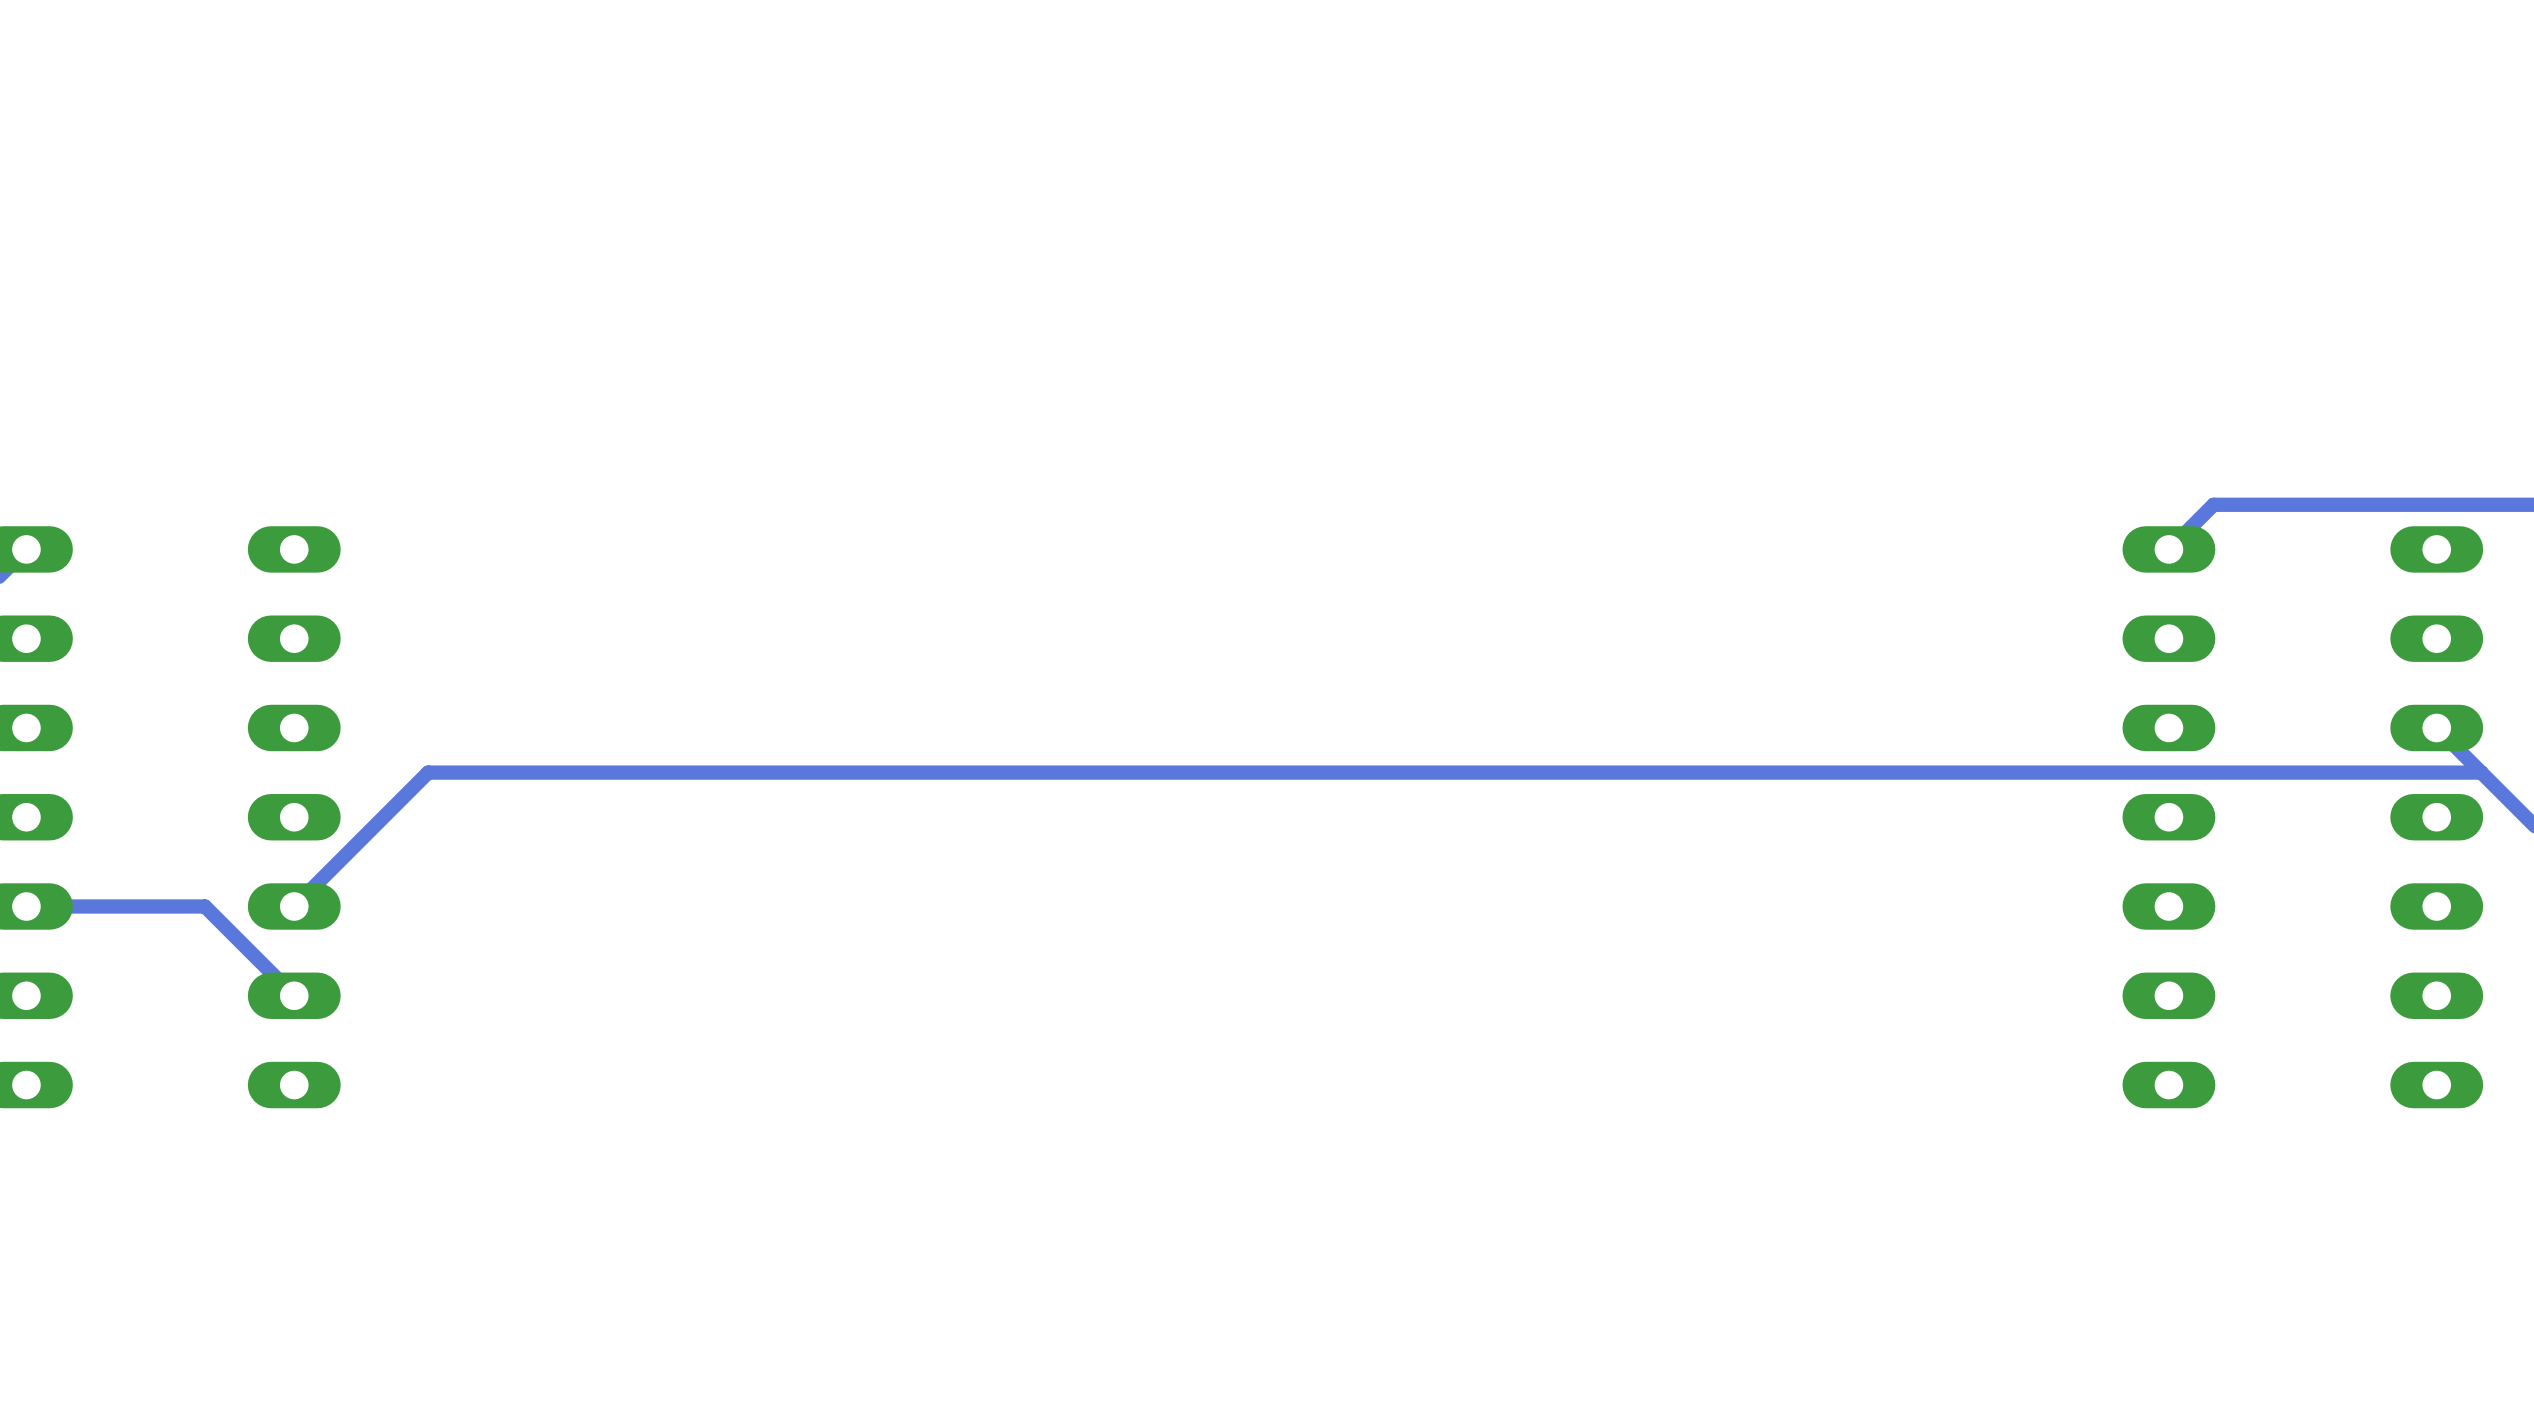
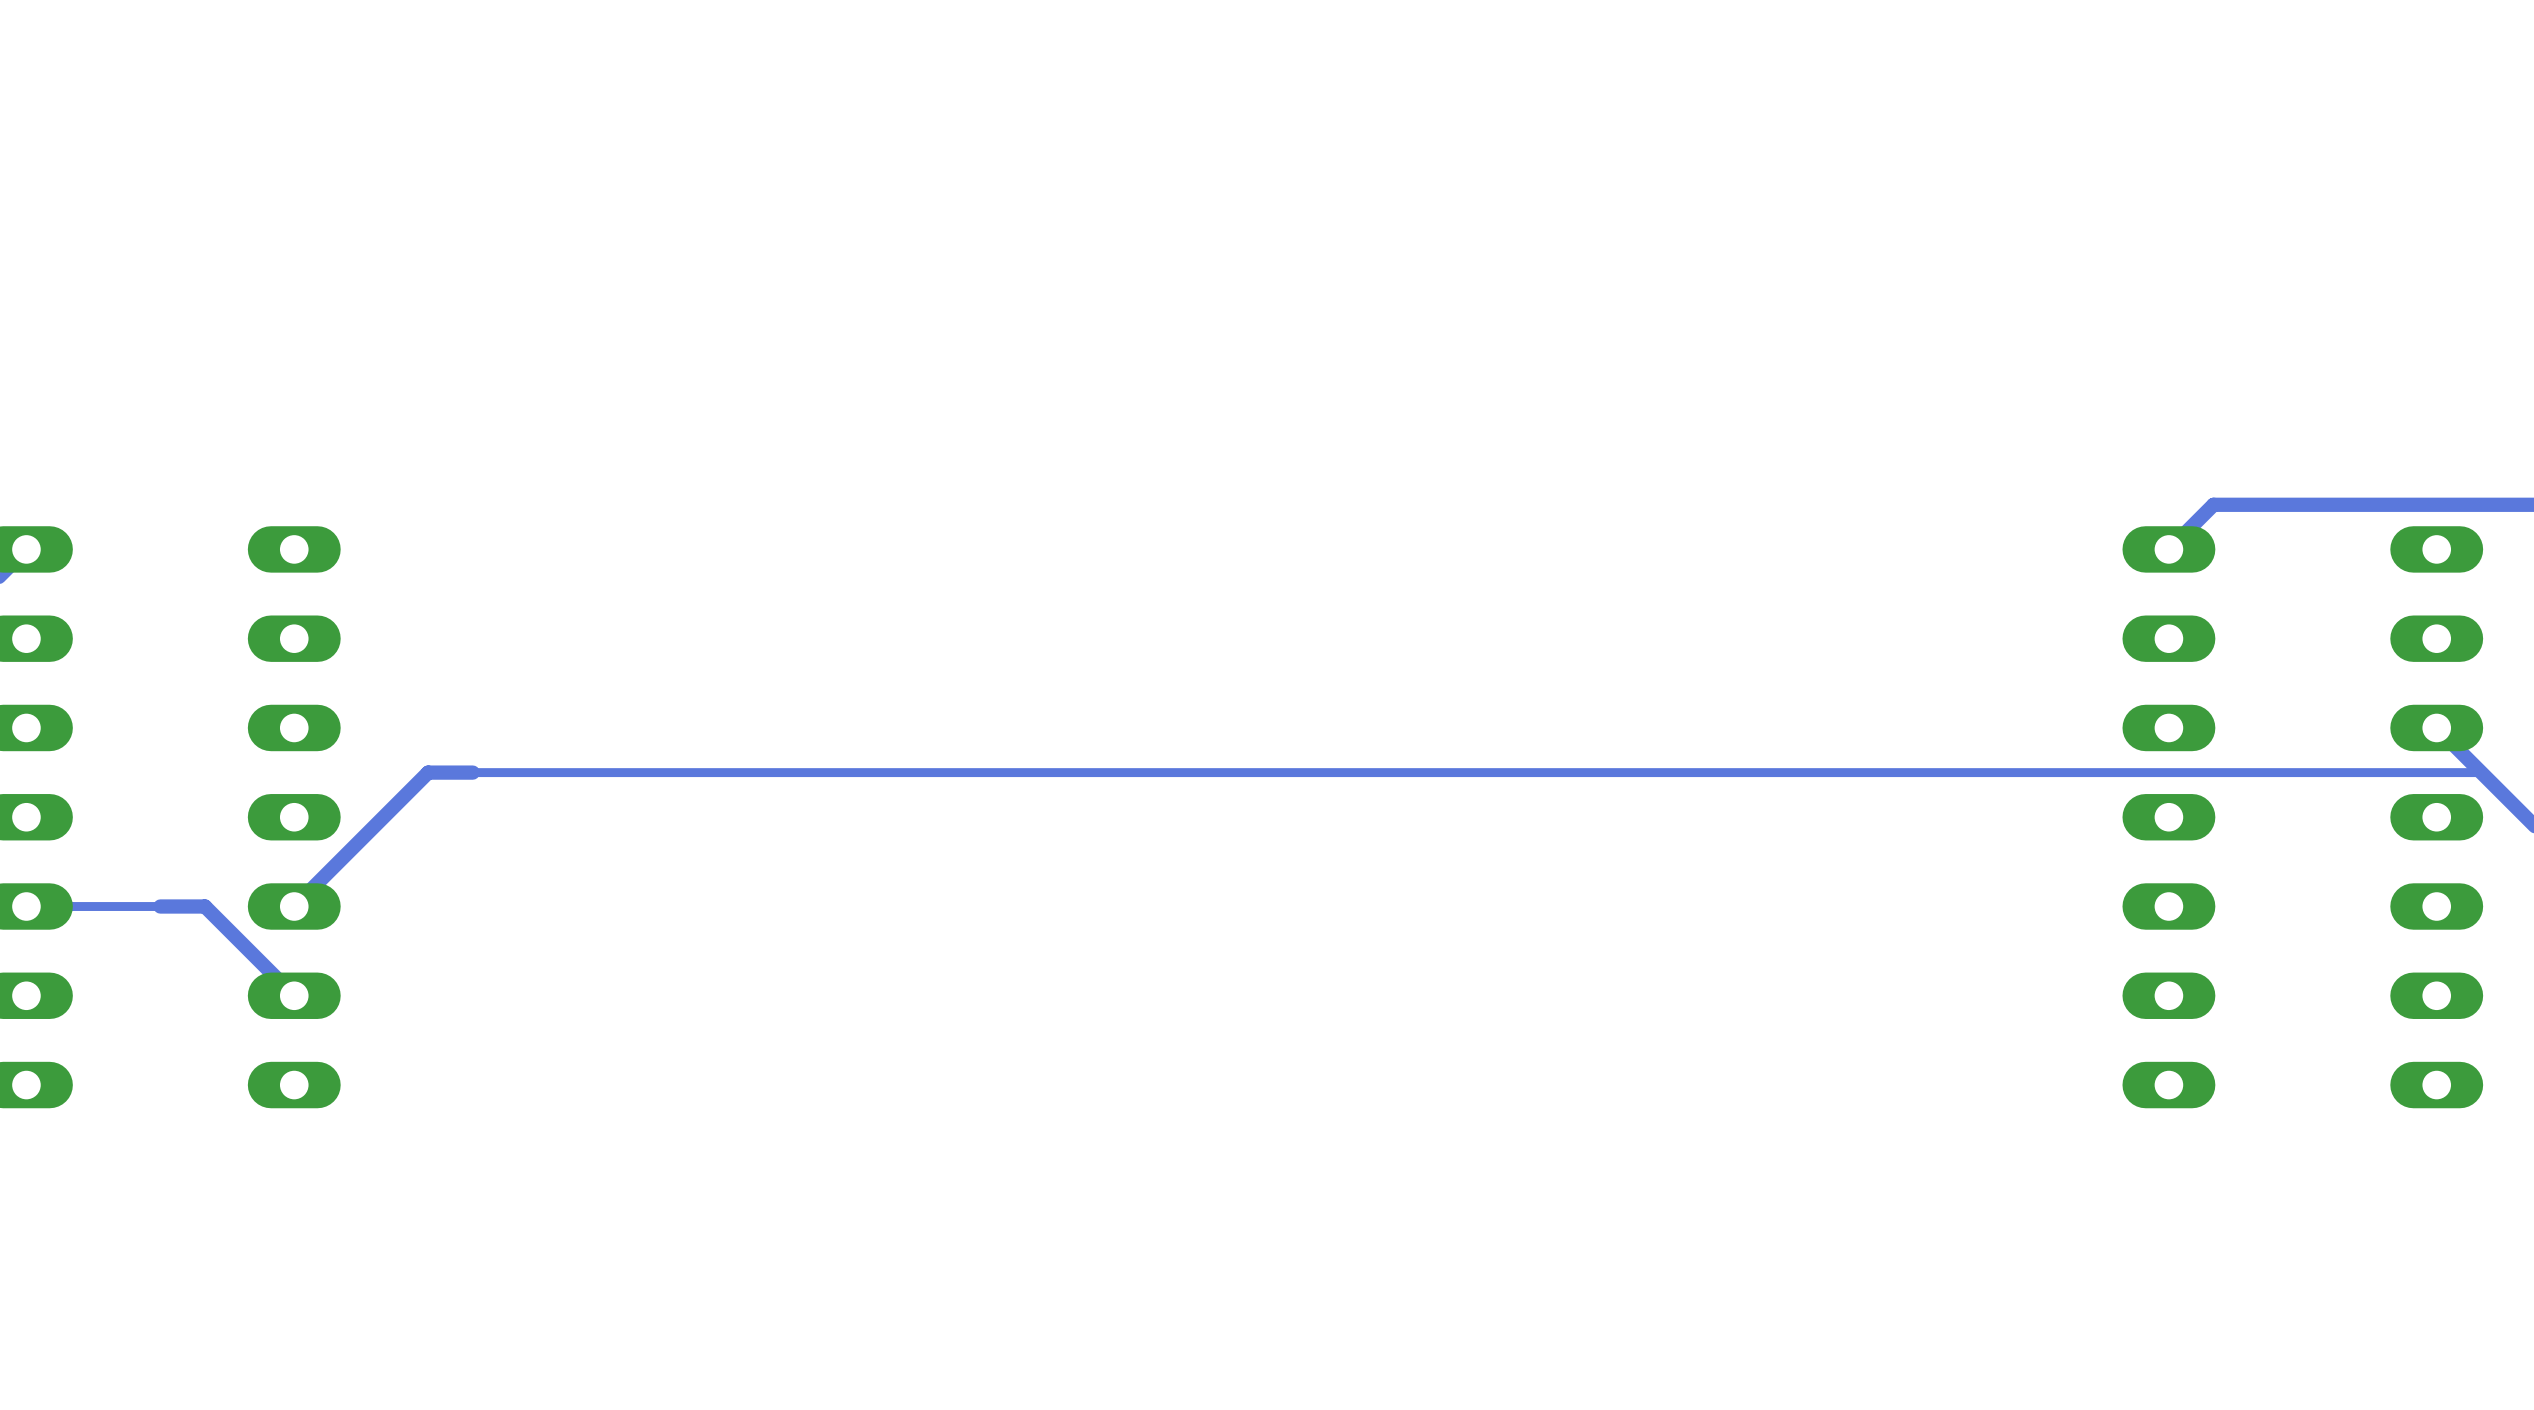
track width: thick (2481, 772) (472, 772) -> thin (2481, 772) (472, 772)
track width: thick (160, 906) (26, 906) -> thin (160, 906) (26, 906)

